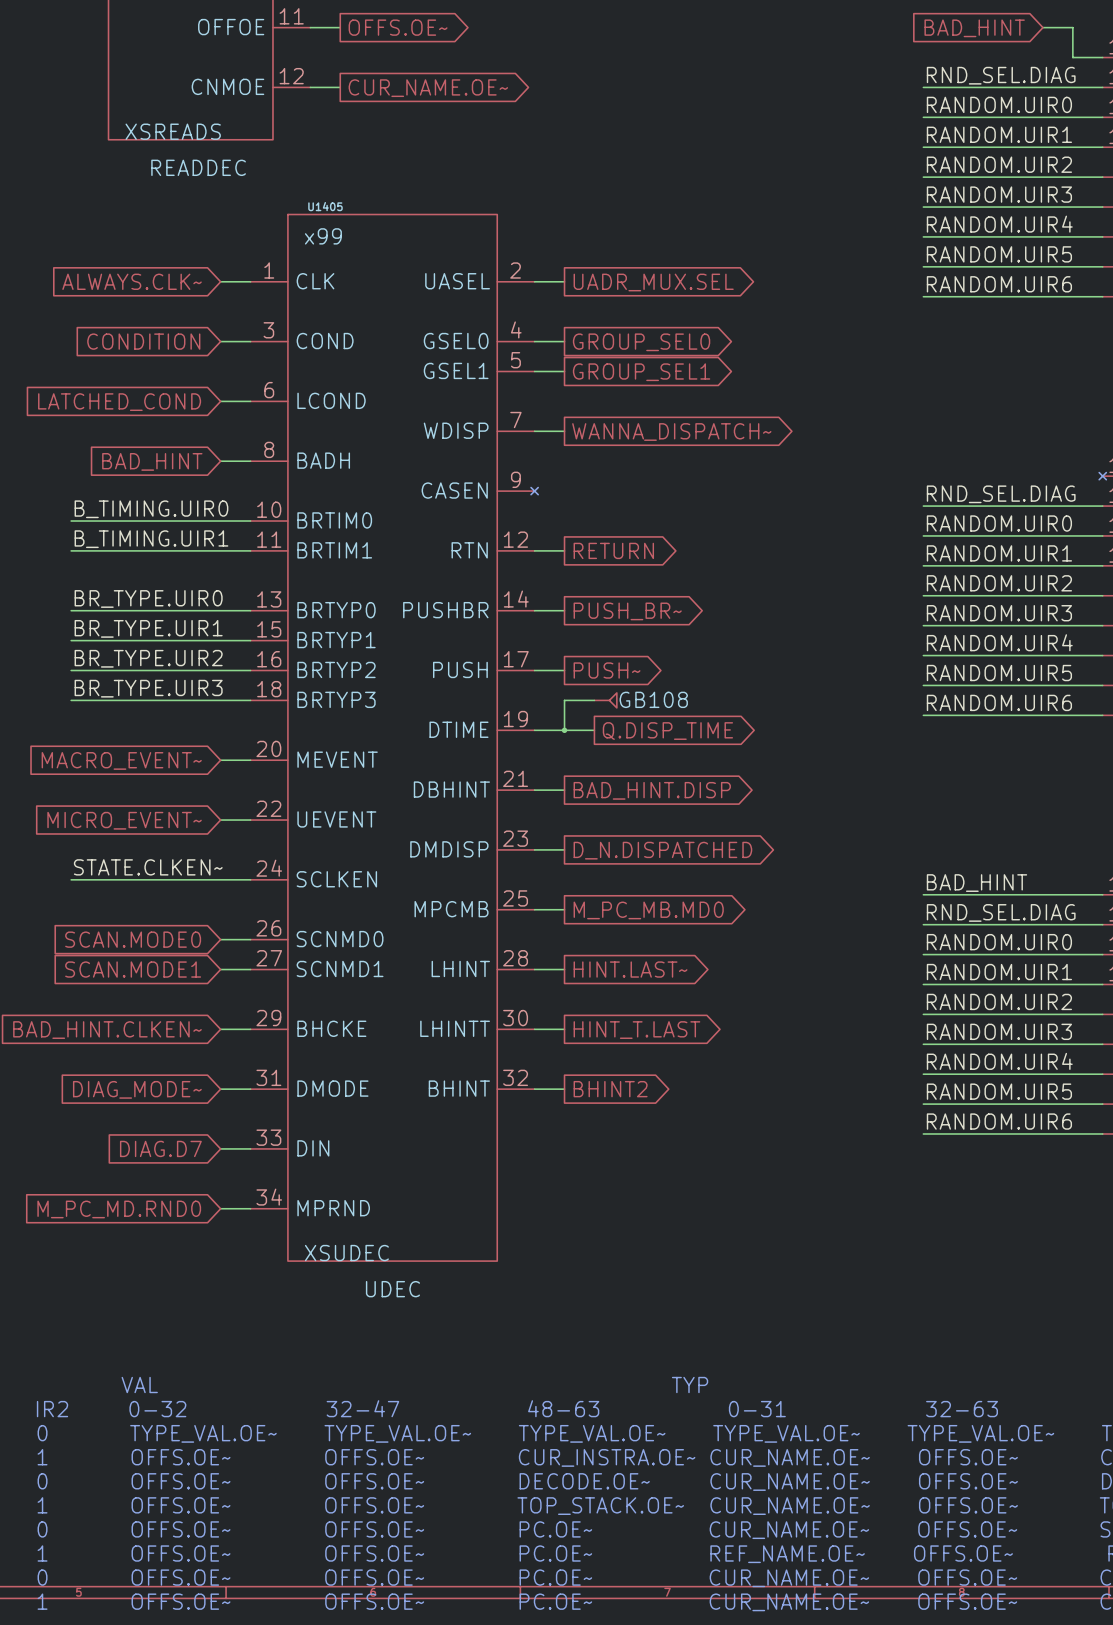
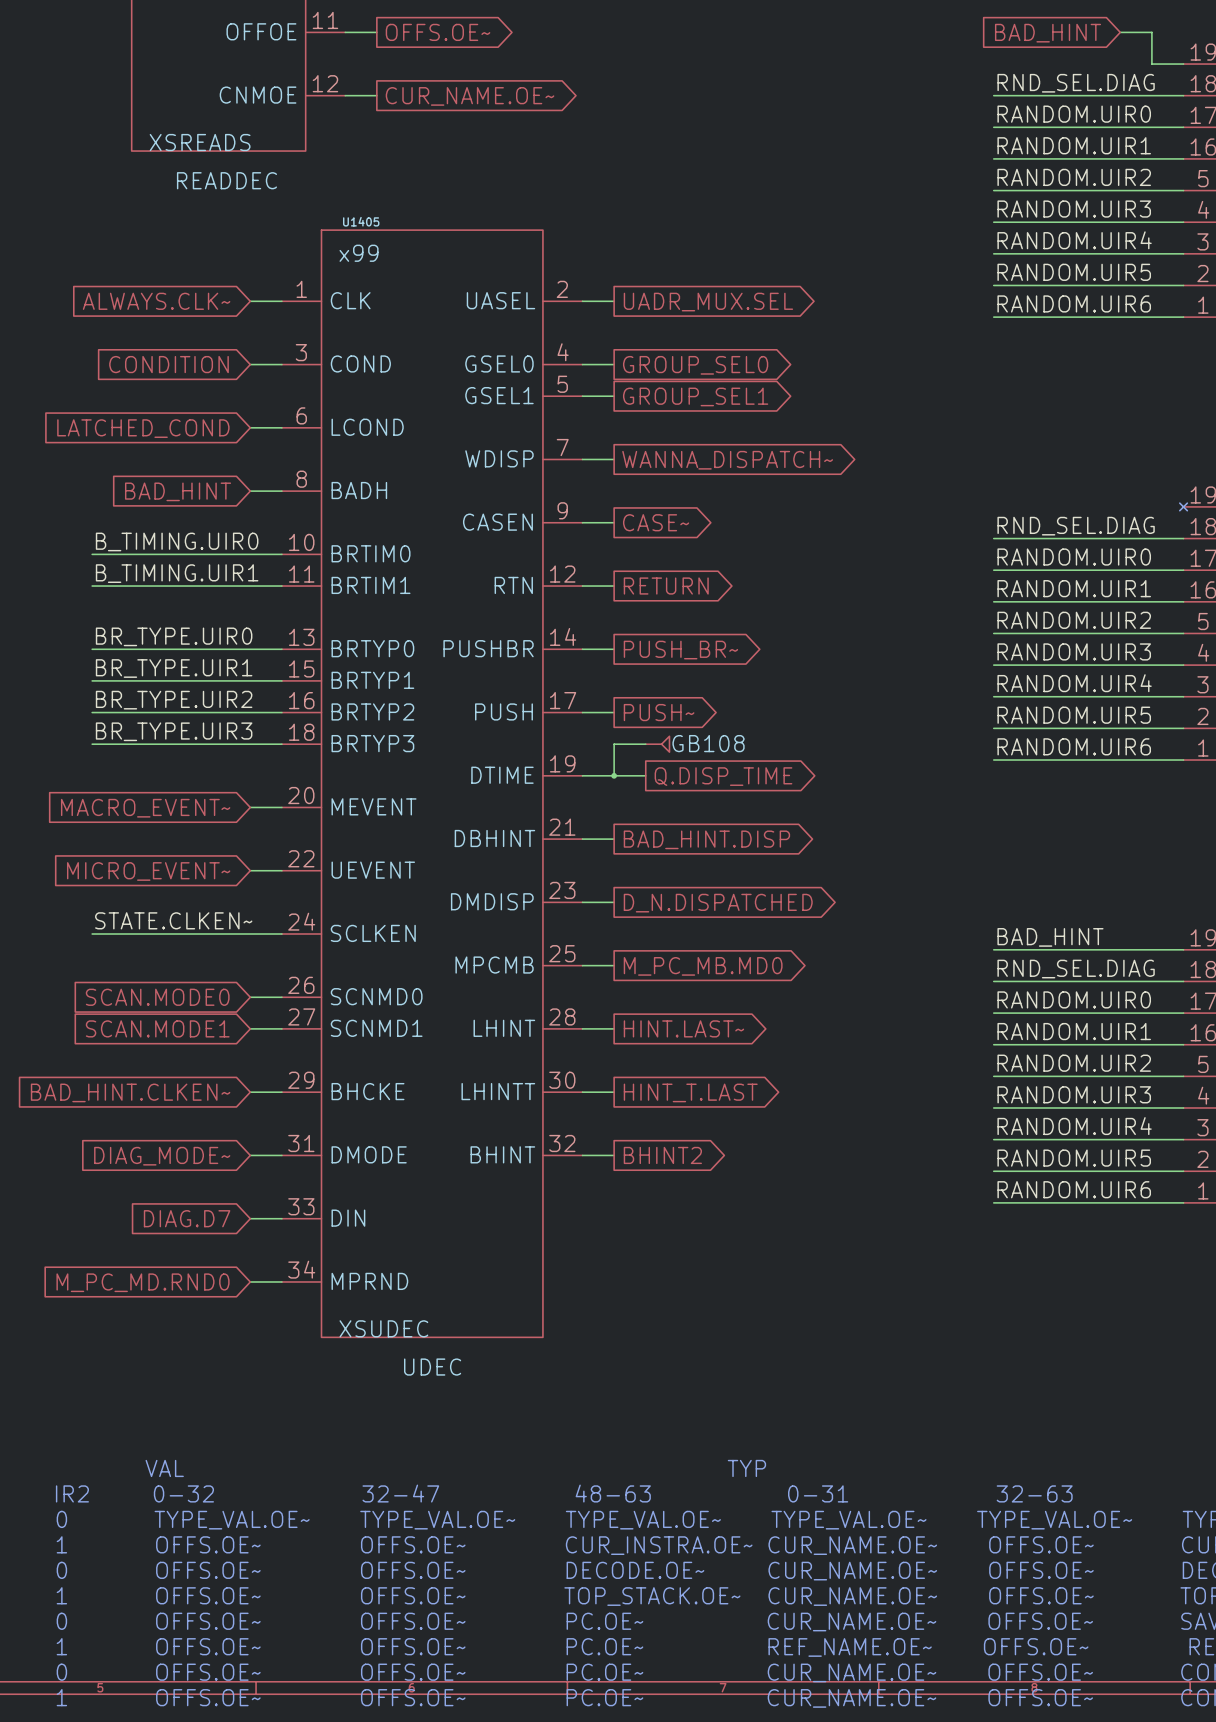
wire: none -> (582, 522) (614, 522)
no-connect mark: (534, 491) -> none
global label: none -> CASE~ (656, 522)

